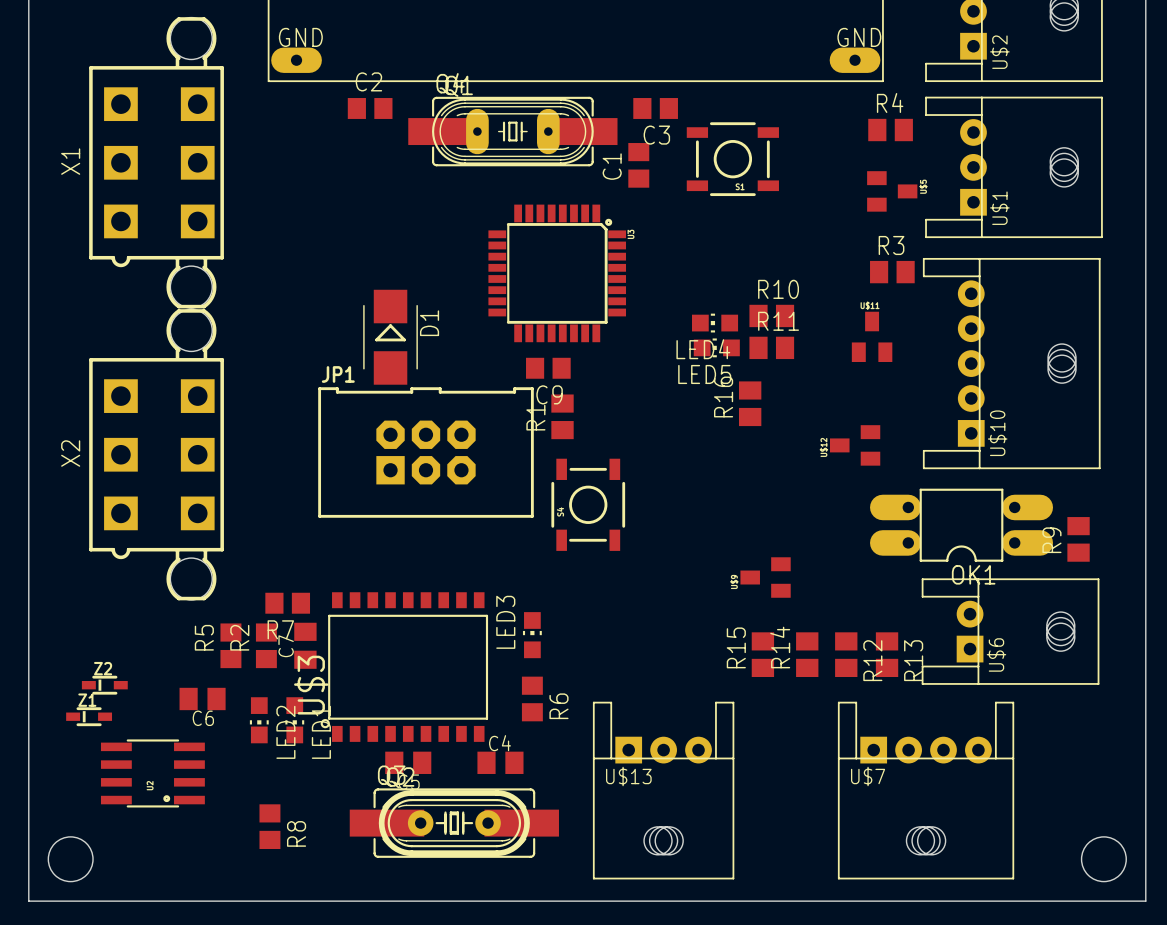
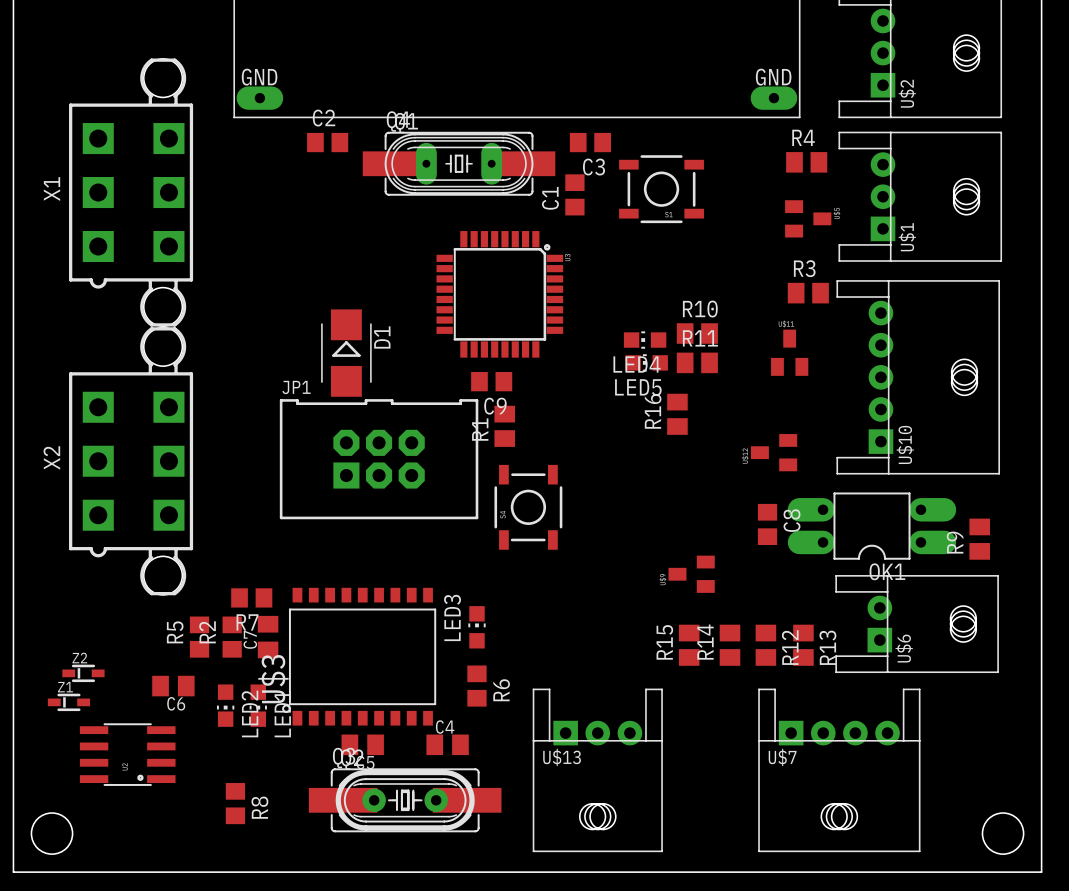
C8: none -> (767, 524)

